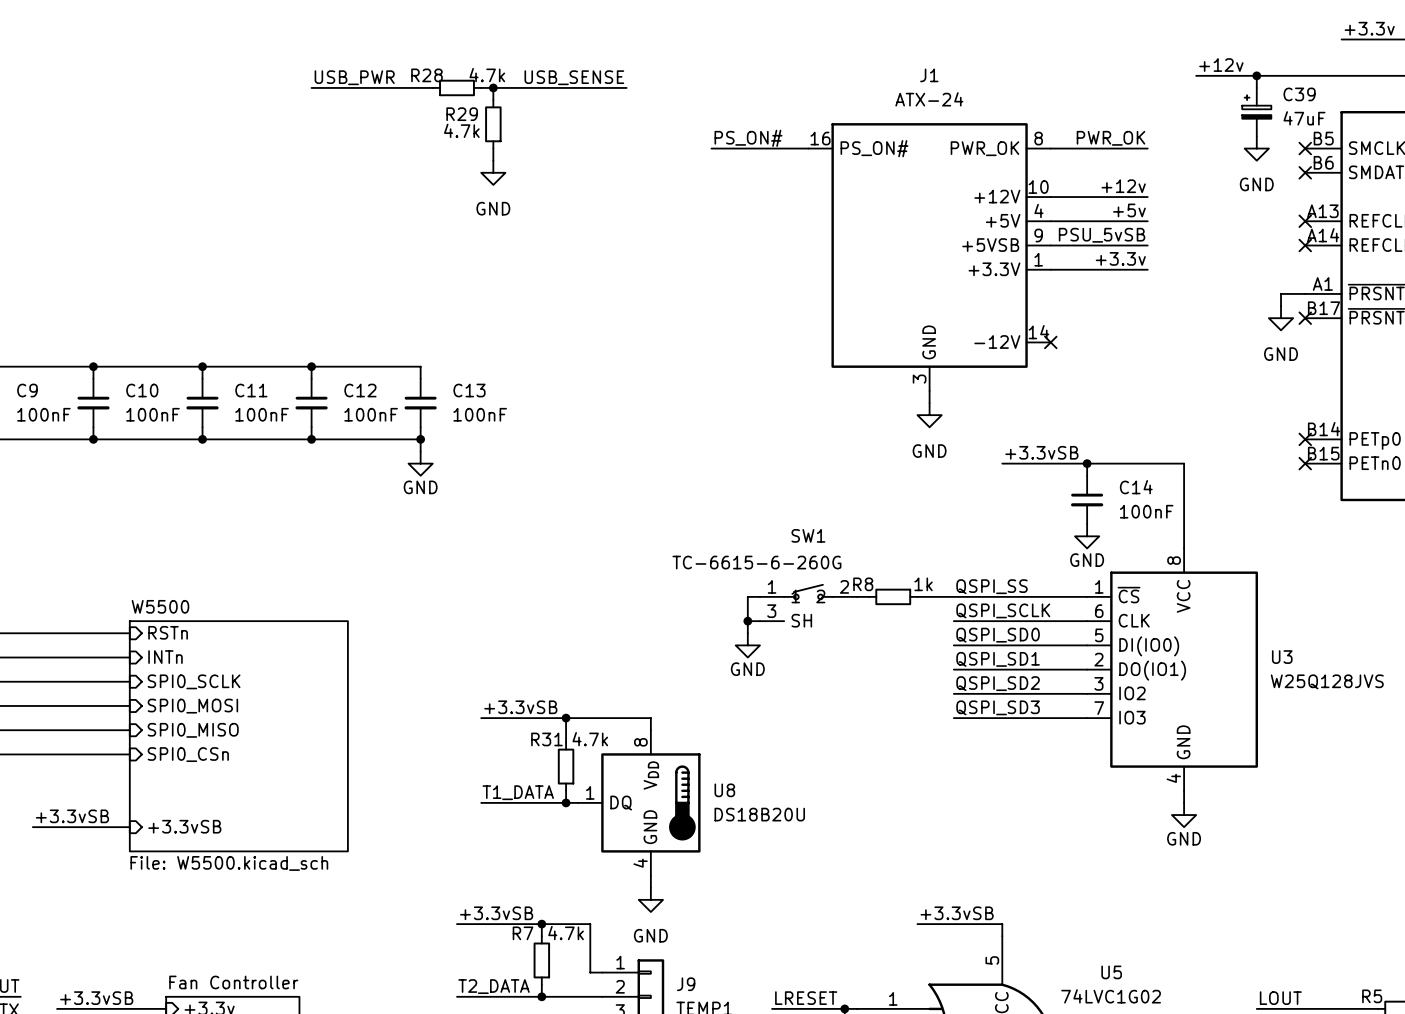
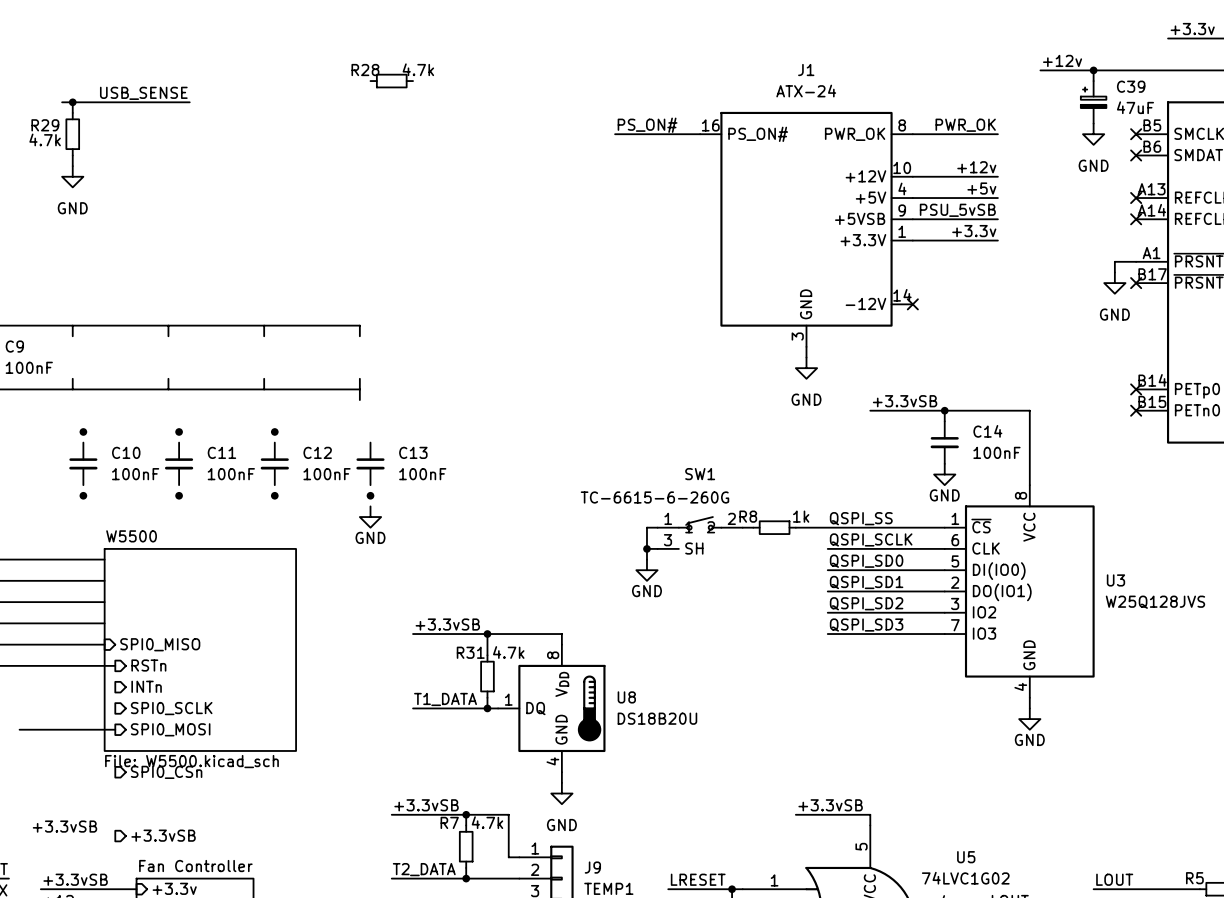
label: USB_PWR (354, 77) -> none
label: USB_SENSE (574, 77) -> none
wire: (311, 87) (432, 87) -> none
wire: (481, 87) (626, 87) -> none
wire: (493, 87) (493, 100) -> none
junction: (493, 87) -> none
label: none -> USB_SENSE (143, 93)
wire: none -> (62, 102) (189, 102)
wire: none -> (72, 102) (72, 112)
junction: none -> (72, 102)
R29 position: (493, 124) -> (72, 134)
wire: (493, 148) (493, 160) -> none
wire: none -> (72, 155) (72, 166)
power symbol: GND (493, 172) -> none
power symbol: none -> GND (72, 176)
junction: (93, 366) -> none
junction: (202, 366) -> none
junction: (311, 366) -> none
C10 position: (93, 403) -> (83, 463)
C11 position: (202, 403) -> (179, 463)
C12 position: (311, 403) -> (274, 463)
C13 position: (420, 403) -> (370, 463)
junction position: (93, 439) -> (83, 431)
junction position: (202, 439) -> (179, 431)
junction position: (311, 439) -> (274, 431)
junction: (420, 439) -> none
power symbol position: GND (420, 463) -> GND (370, 517)
junction: none -> (83, 495)
junction: none -> (179, 495)
junction: none -> (274, 495)
junction: none -> (370, 495)
sheet pin position: RSTn (168, 632) -> RSTn (148, 665)
sheet pin position: INTn (165, 657) -> INTn (146, 686)
sheet pin position: SPI0_SCLK (194, 681) -> SPI0_SCLK (171, 708)
sheet pin position: SPI0_MOSI (192, 706) -> SPI0_MOSI (170, 729)
wire: none -> (104, 665) (115, 665)
sheet pin position: SPI0_CSn (188, 754) -> SPI0_CSn (166, 772)
label position: +3.3vSB (72, 816) -> +3.3vSB (64, 826)
sheet pin position: +3.3vSB (184, 826) -> +3.3vSB (163, 835)
wire: none -> (104, 729) (115, 729)

